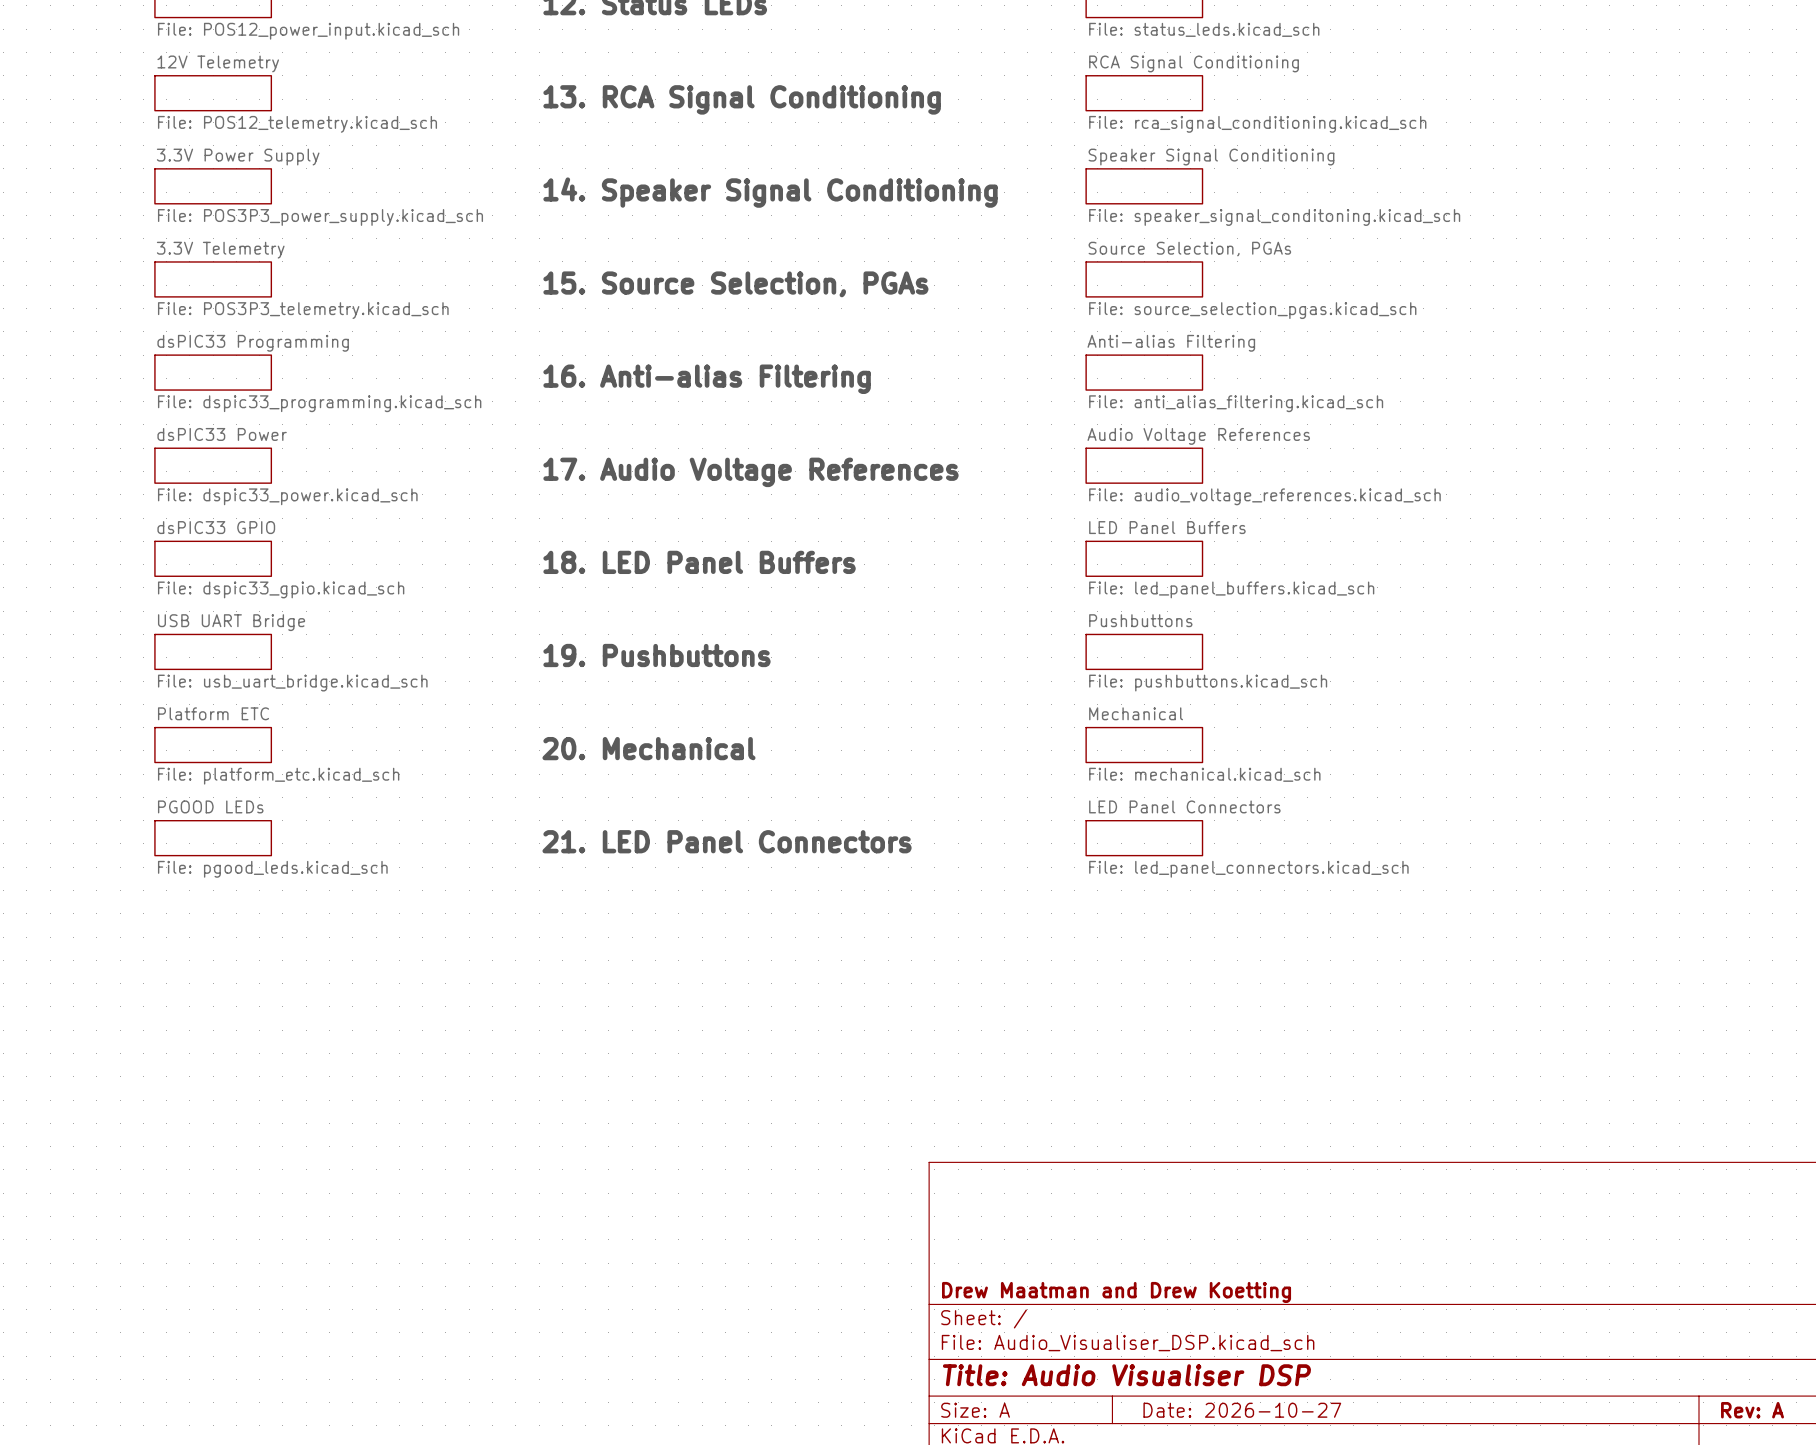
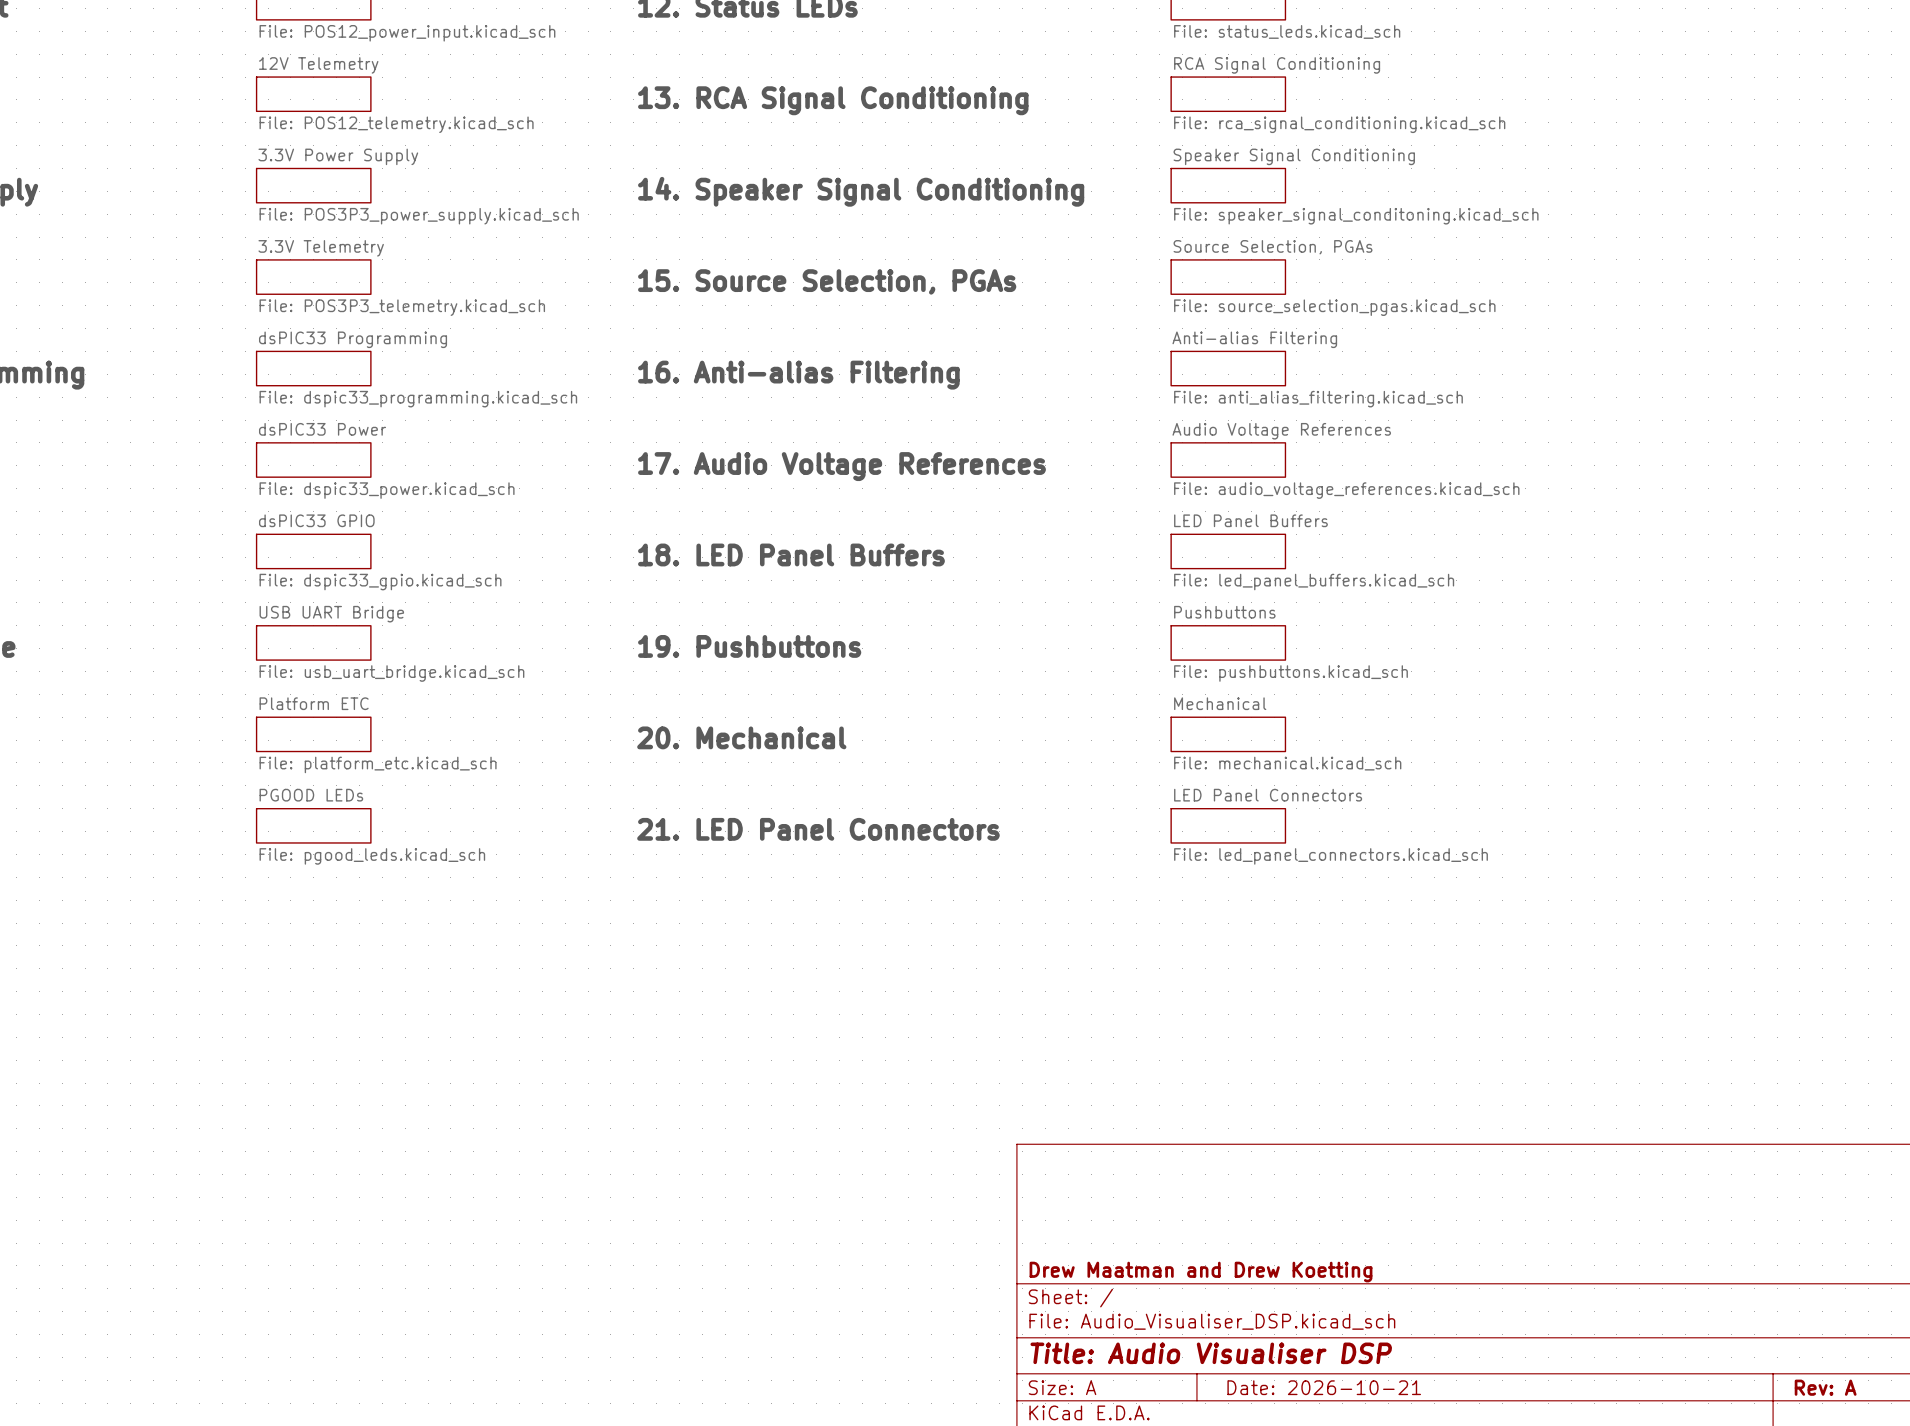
title block: Date: 2026-10-27 (1242, 1410) -> Date: 2026-10-21 (1324, 1387)

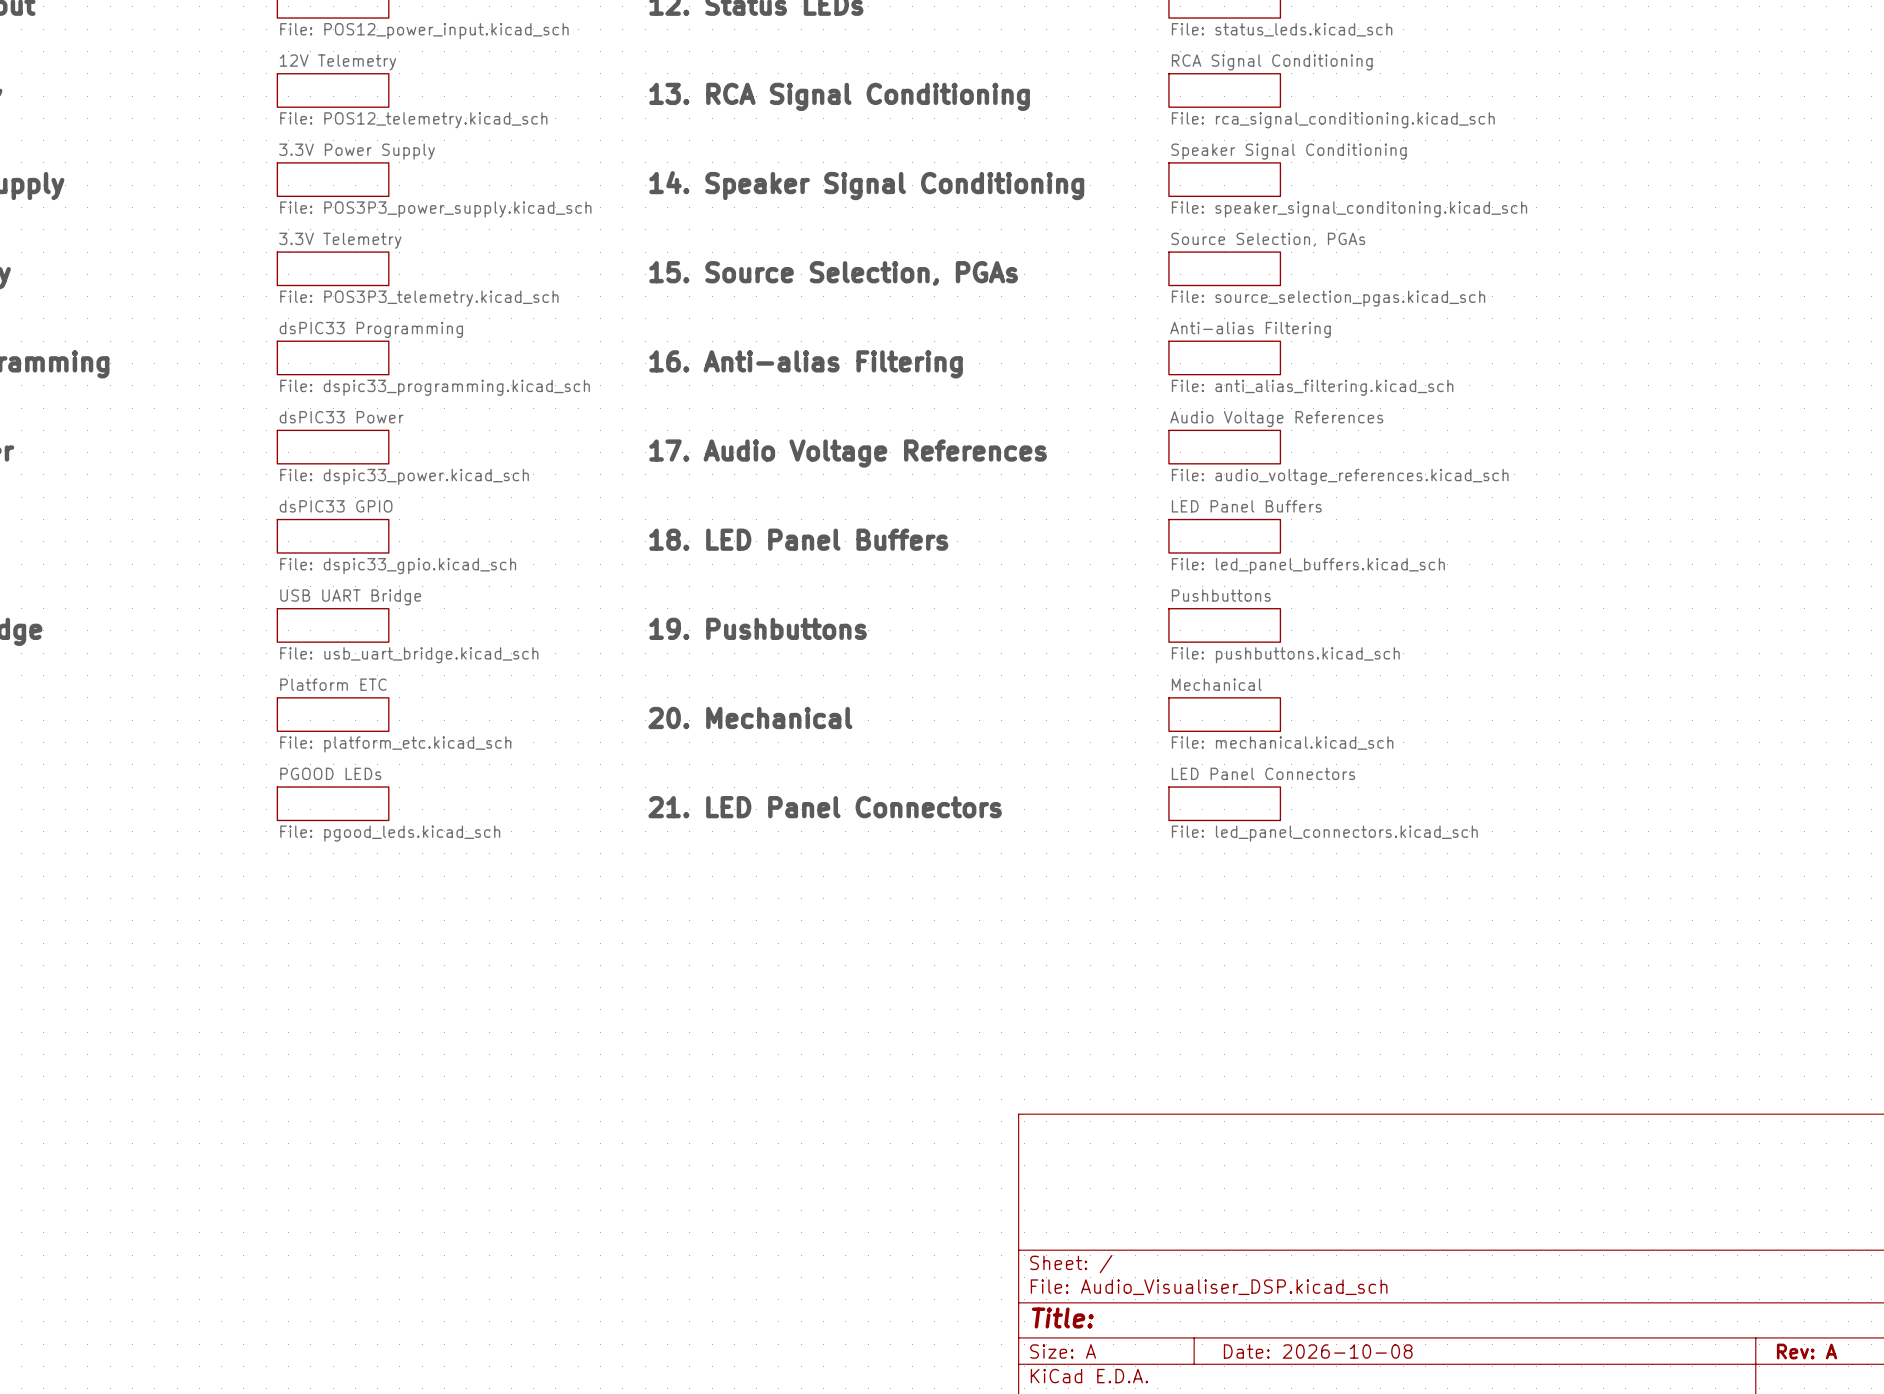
title block: Drew Maatman and Drew Koetting (1200, 1272) -> none
title block: Title: Audio Visualiser DSP (1211, 1353) -> Title: (1062, 1317)
title block: Date: 2026-10-21 (1324, 1387) -> Date: 2026-10-08 (1318, 1351)

